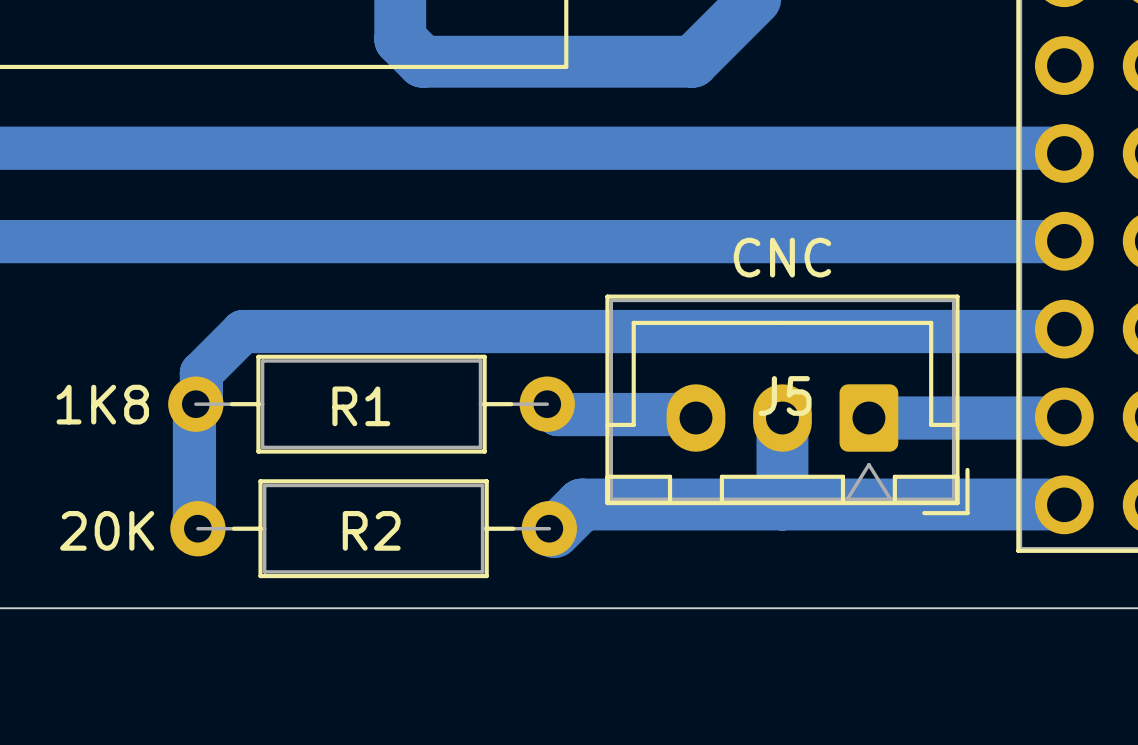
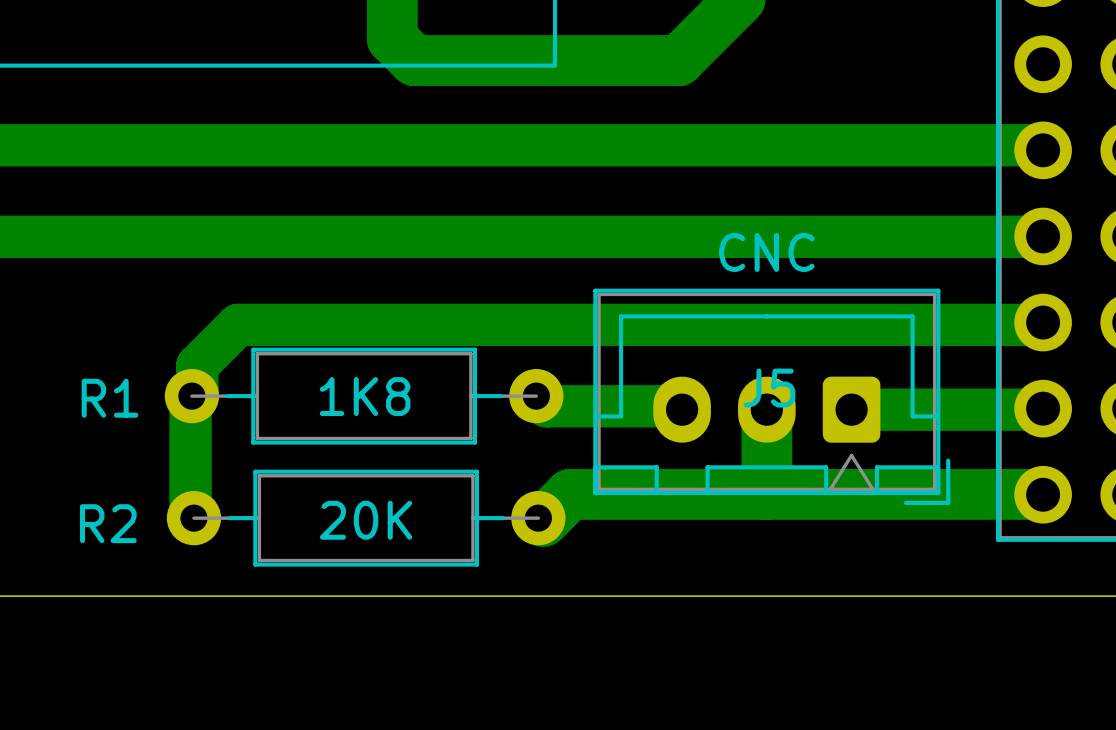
R1 value position: 1K8 (102, 404) -> 1K8 (365, 396)
R1 name position: R1 (361, 406) -> R1 (110, 398)
R2 value position: 20K (107, 530) -> 20K (366, 520)
R2 name position: R2 (371, 530) -> R2 (108, 523)

